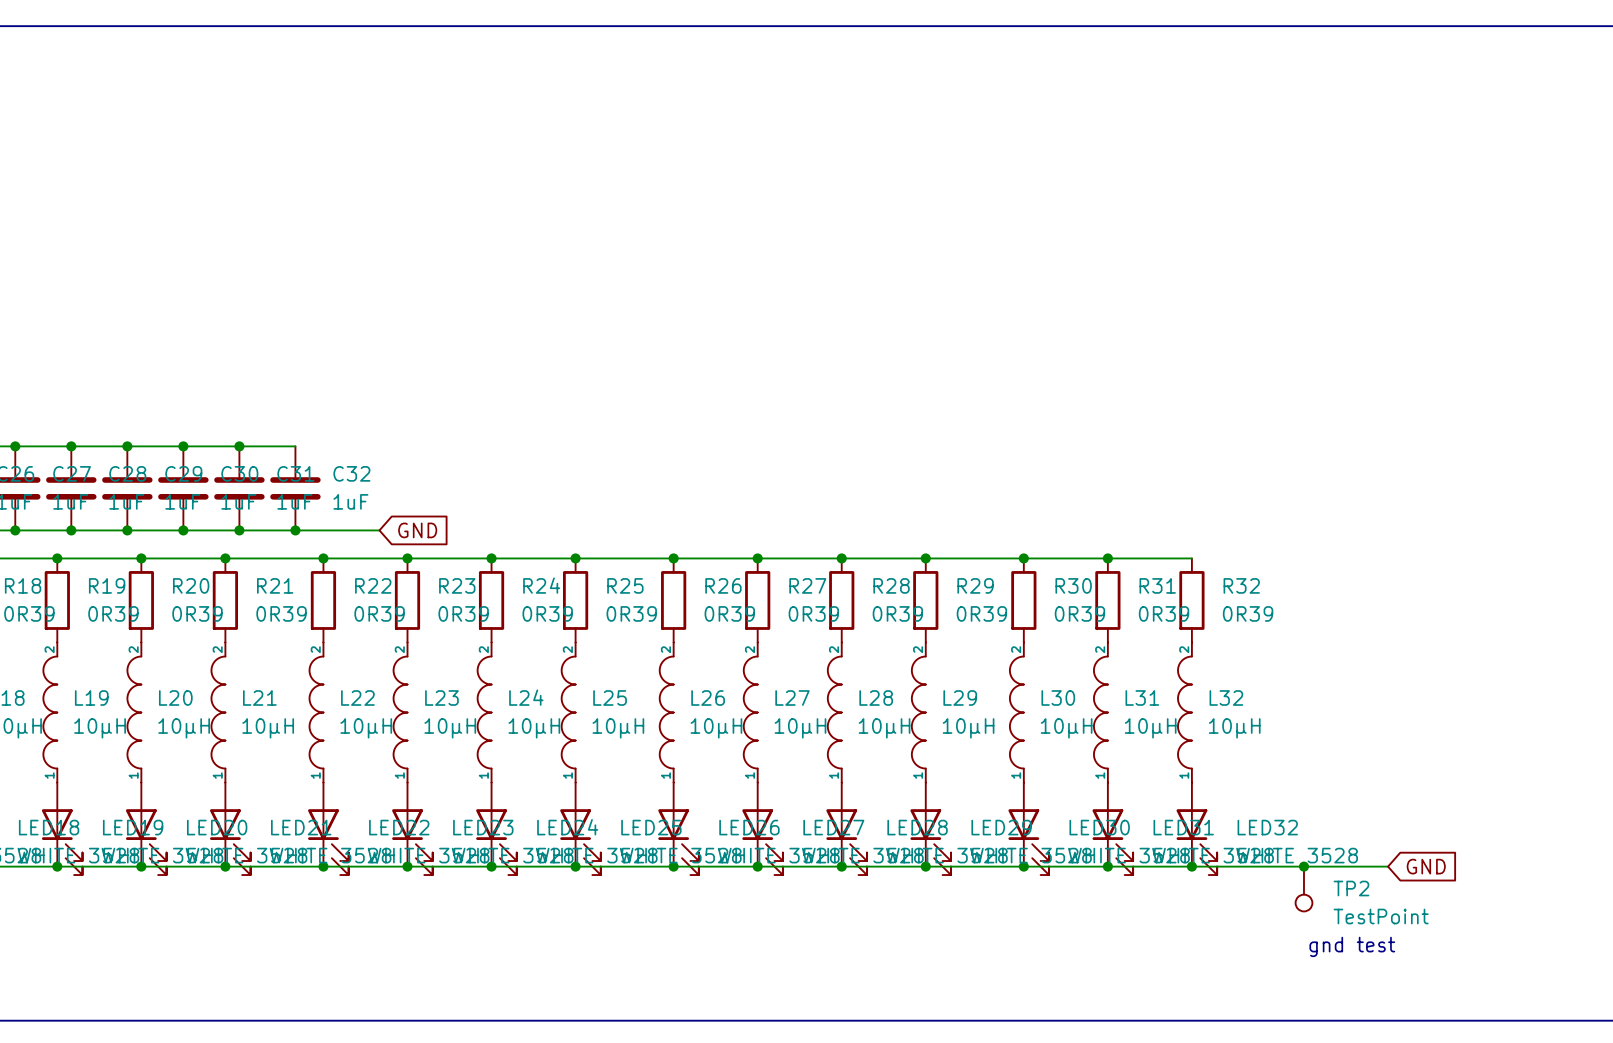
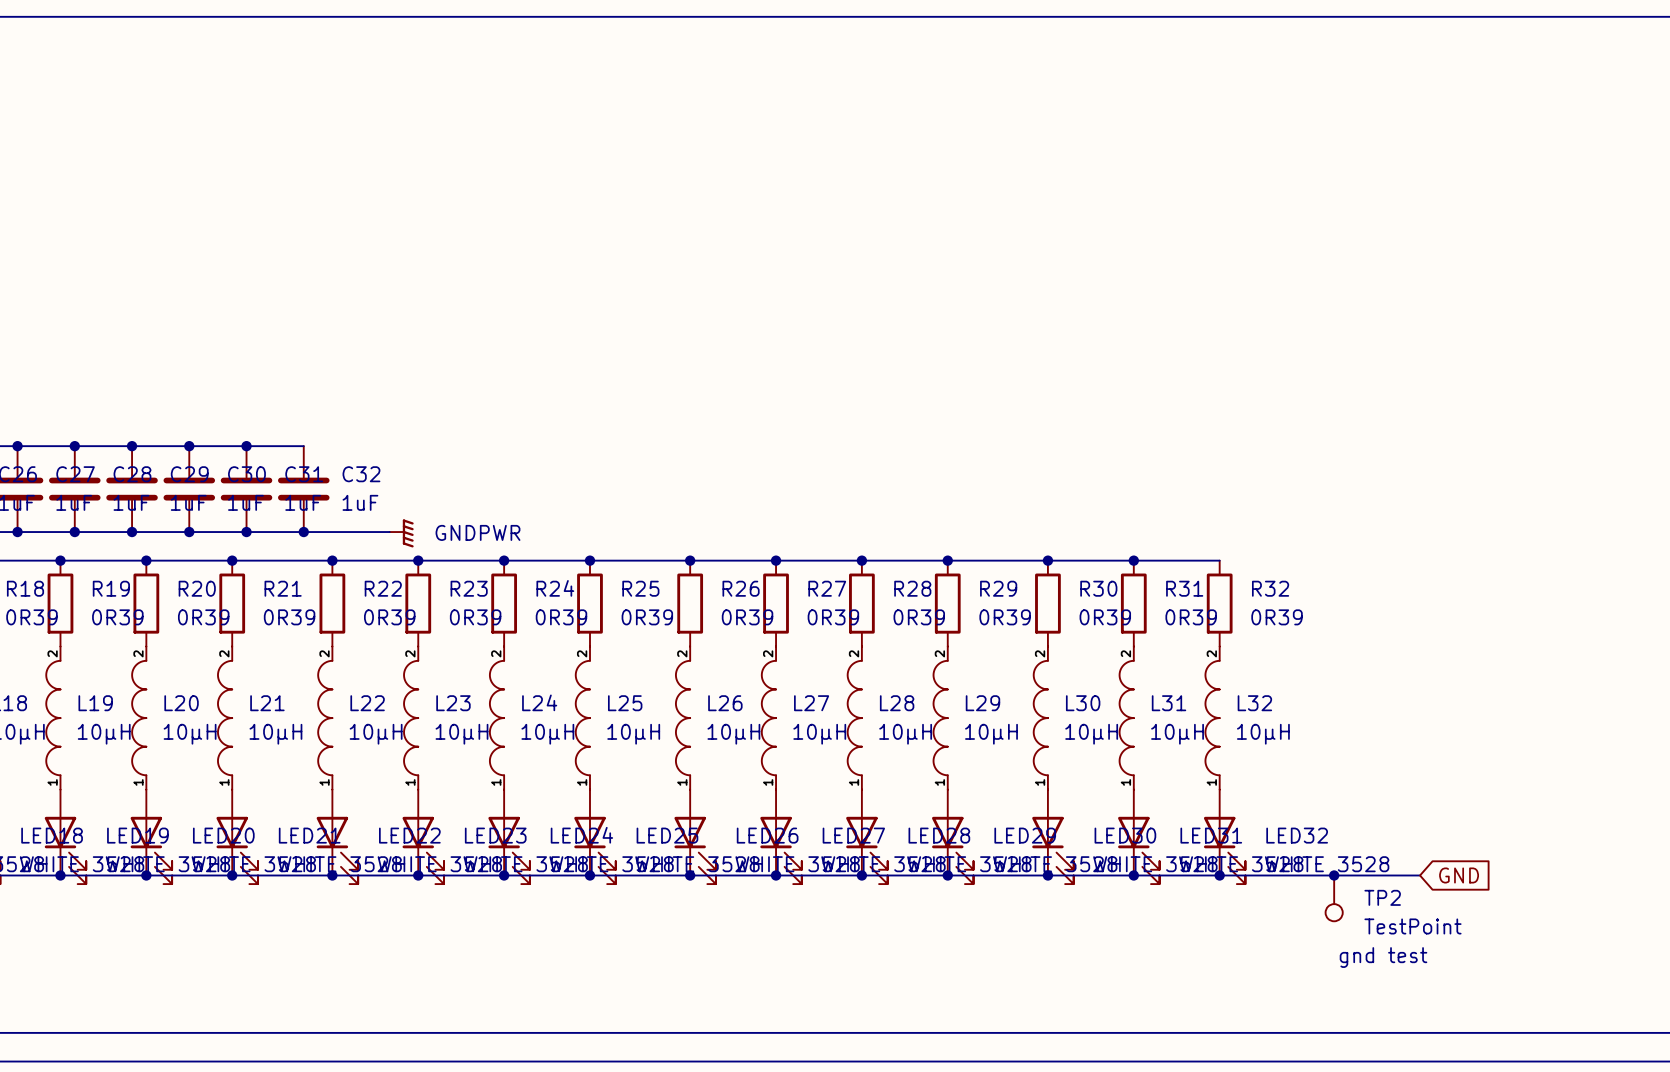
global label: GND (417, 530) -> none
power symbol: none -> GNDPWR (401, 533)

